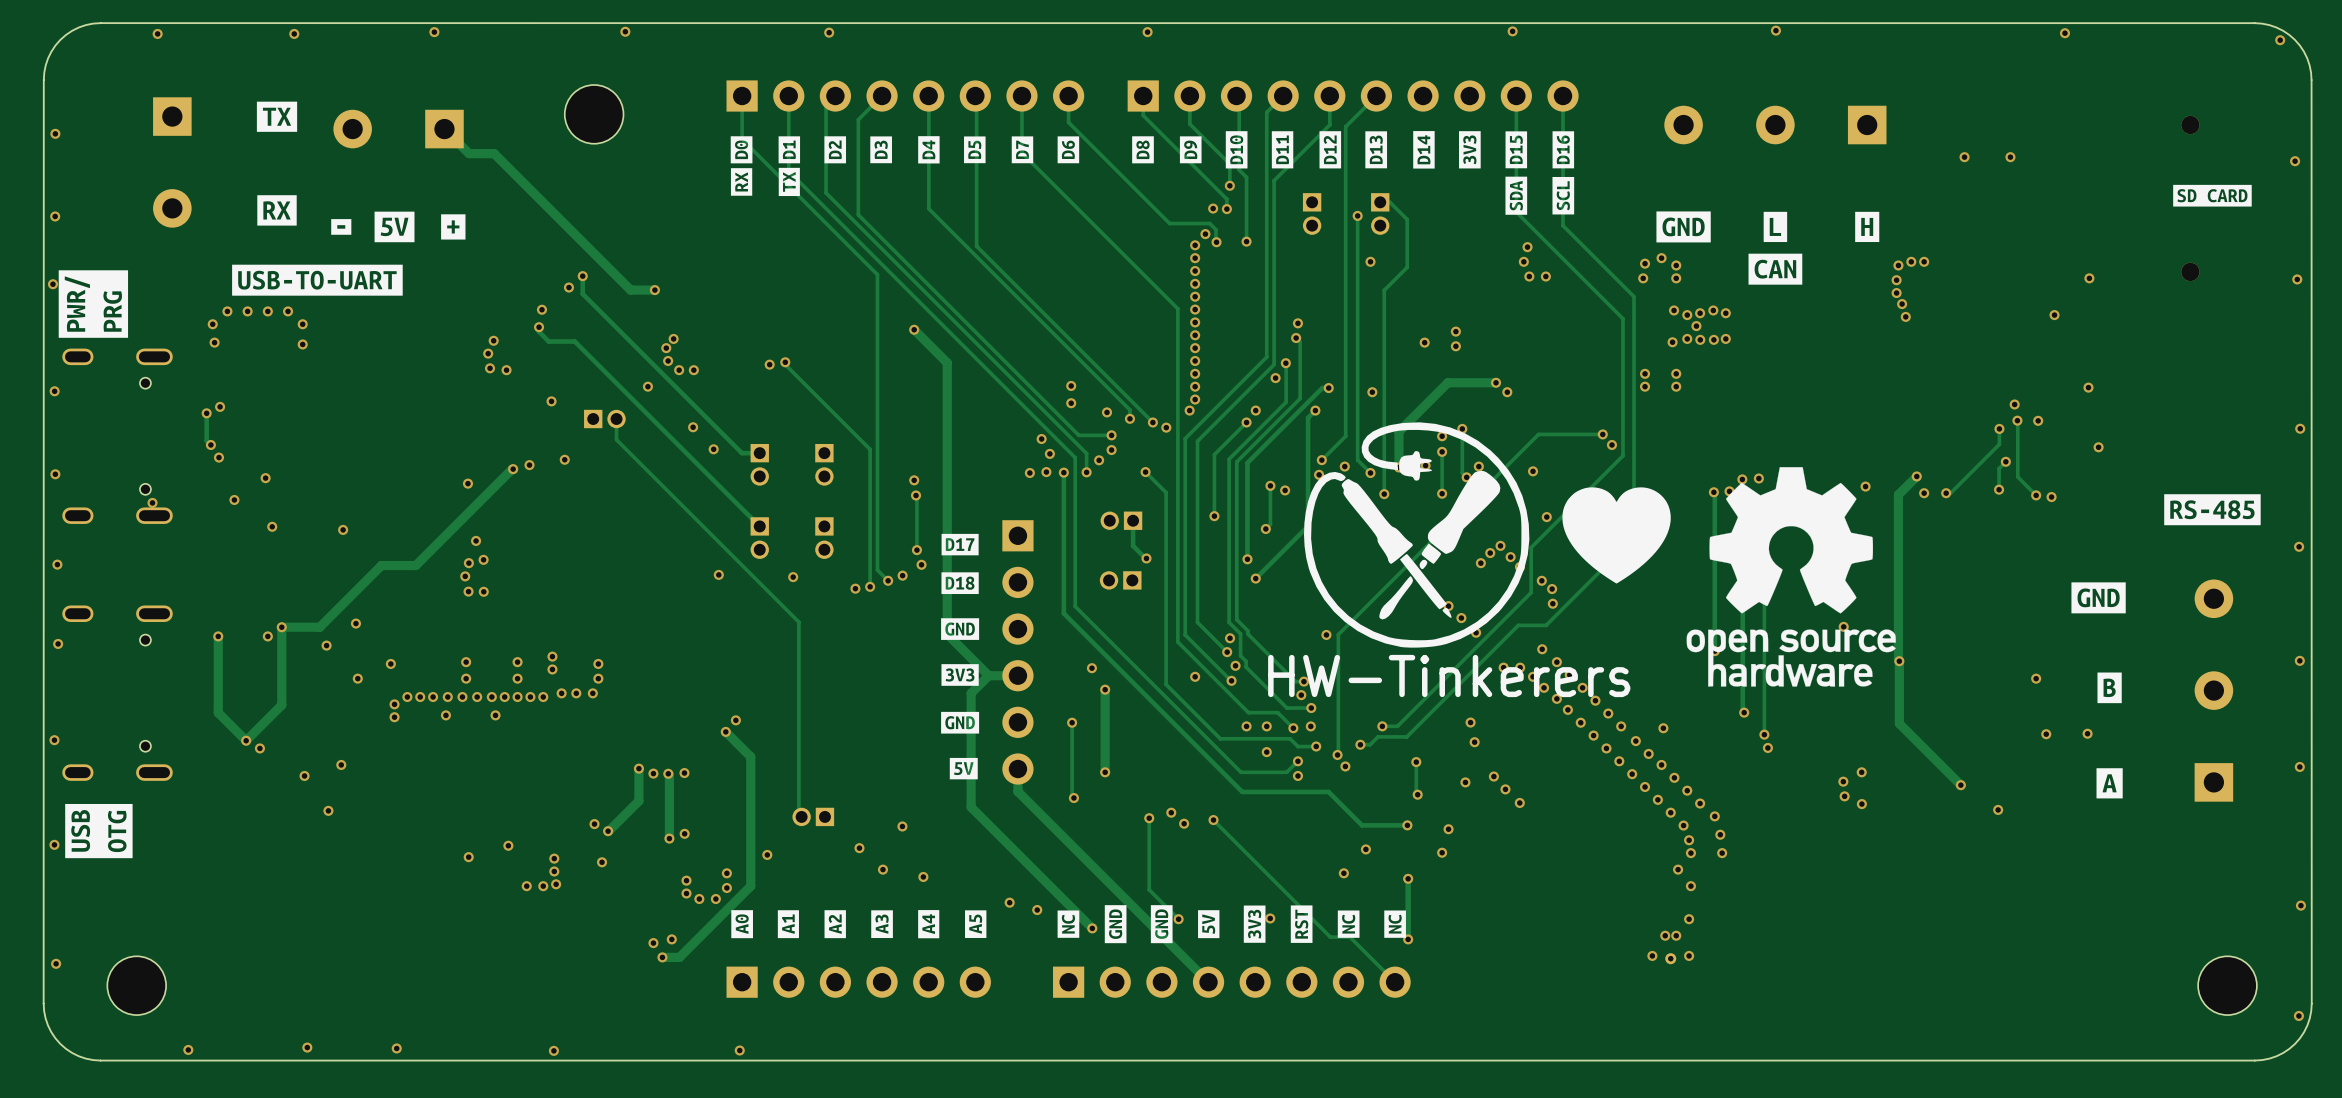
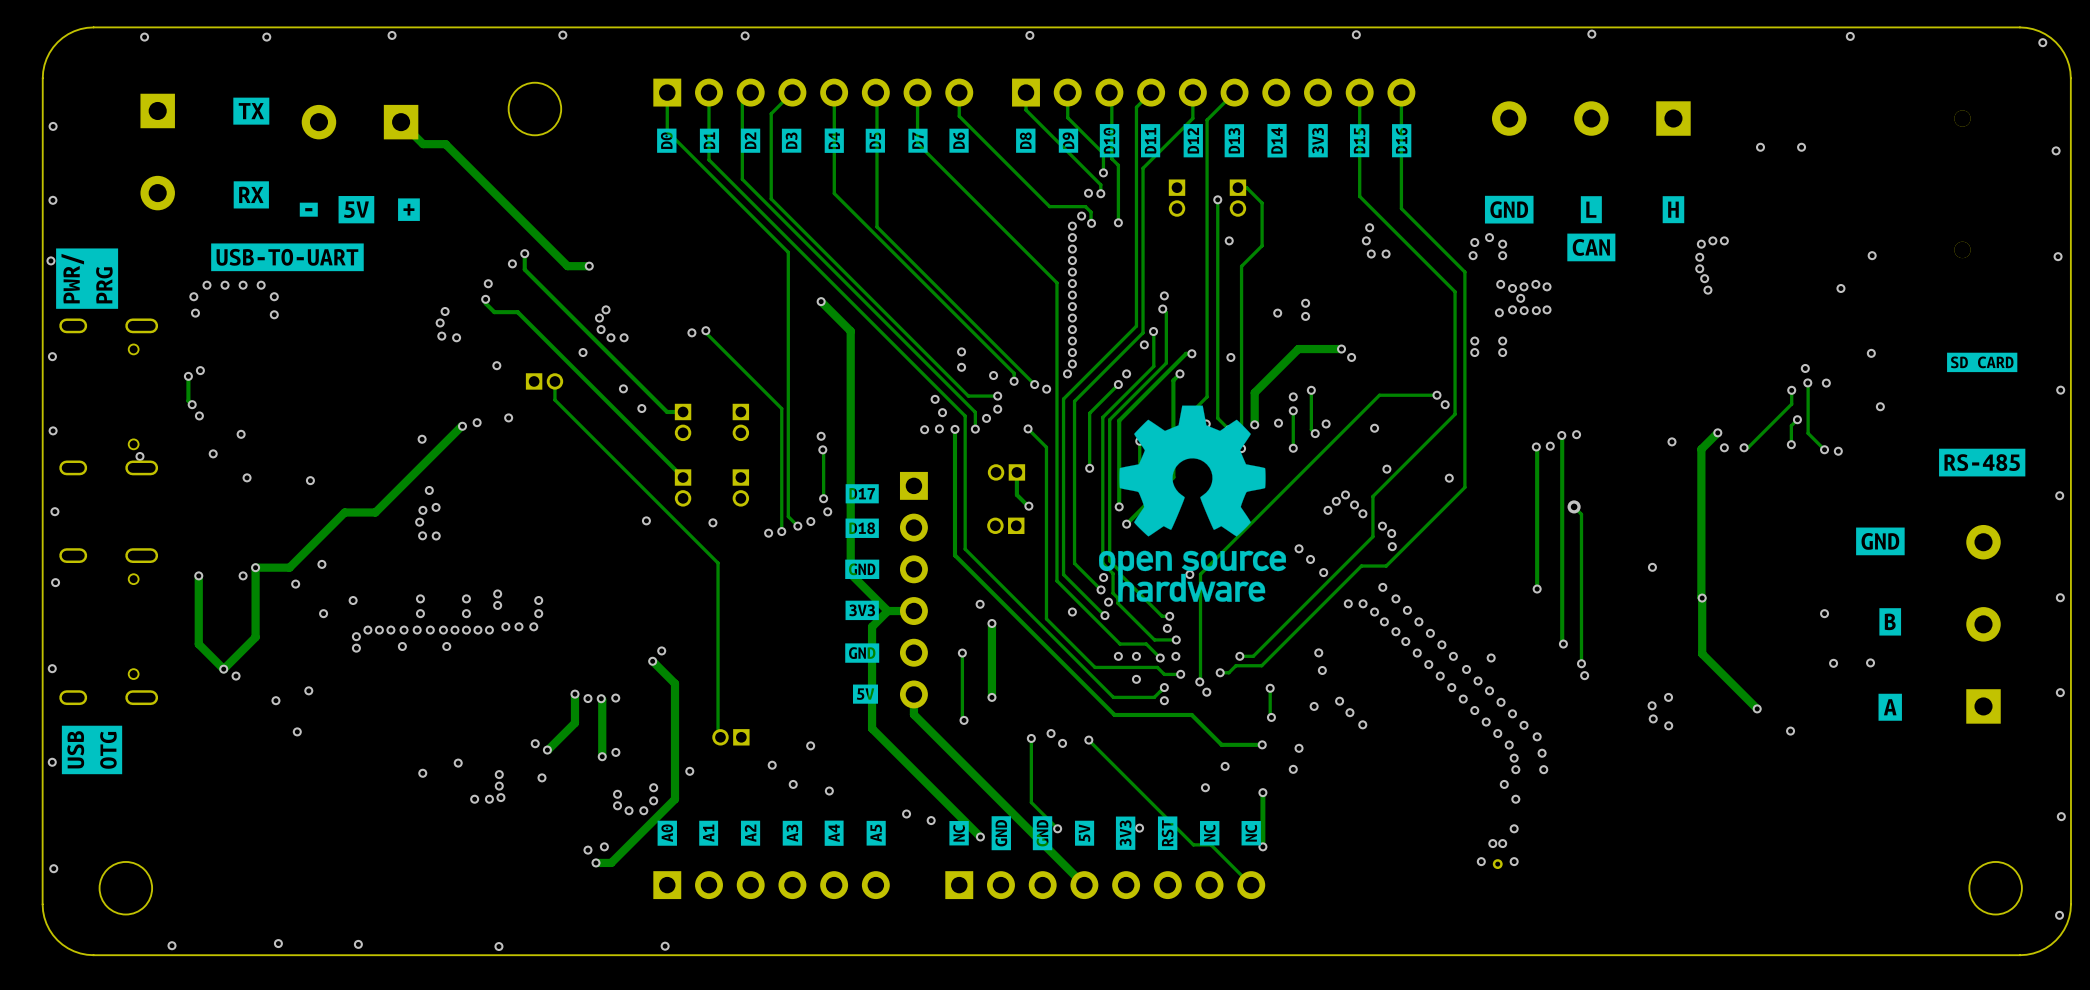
drawing: [778, 167, 800, 197] -> none
drawing: [730, 168, 753, 196] -> none
drawing: [1505, 176, 1528, 215] -> none
drawing: [1552, 176, 1575, 215] -> none
drawing position: (2212, 195) -> (1982, 362)
drawing: [1304, 422, 1896, 687] -> none
drawing: none -> [1098, 405, 1287, 602]

